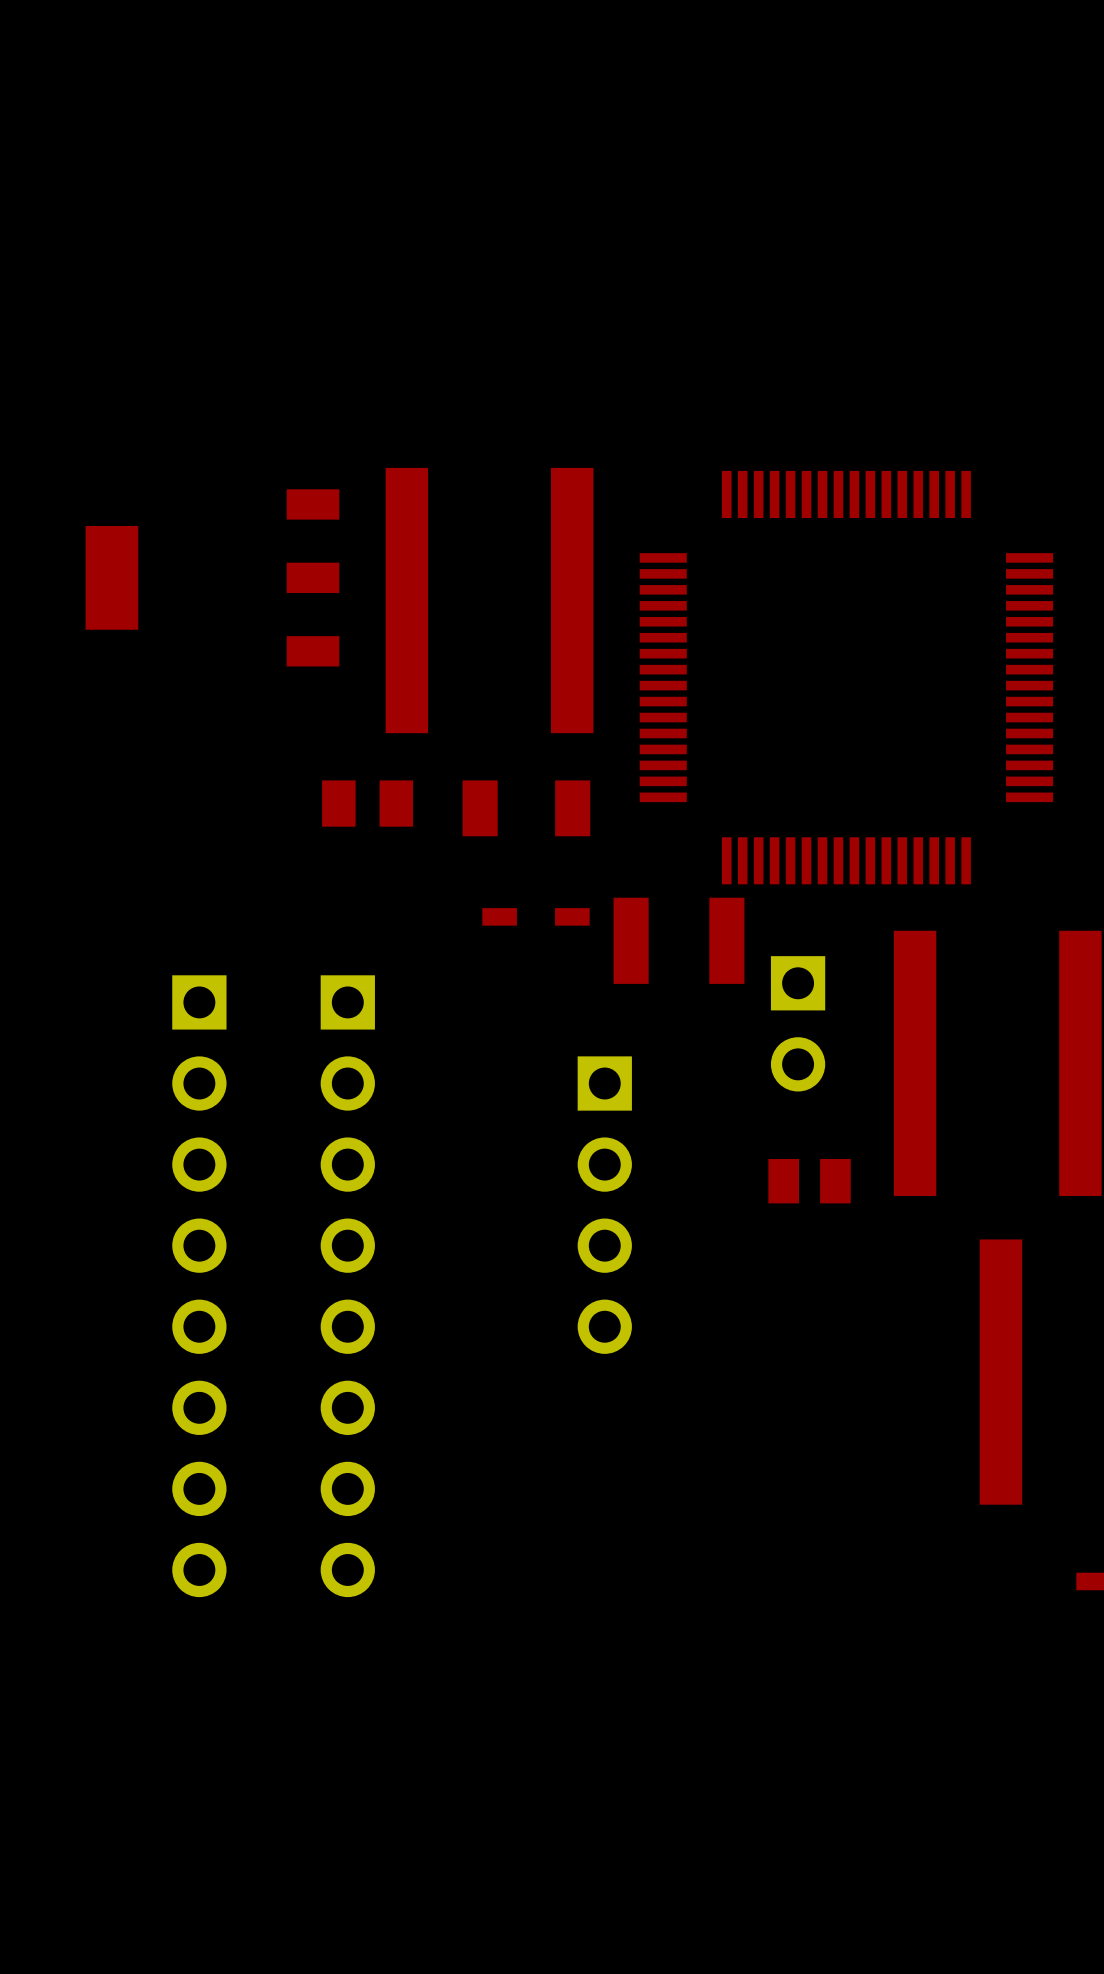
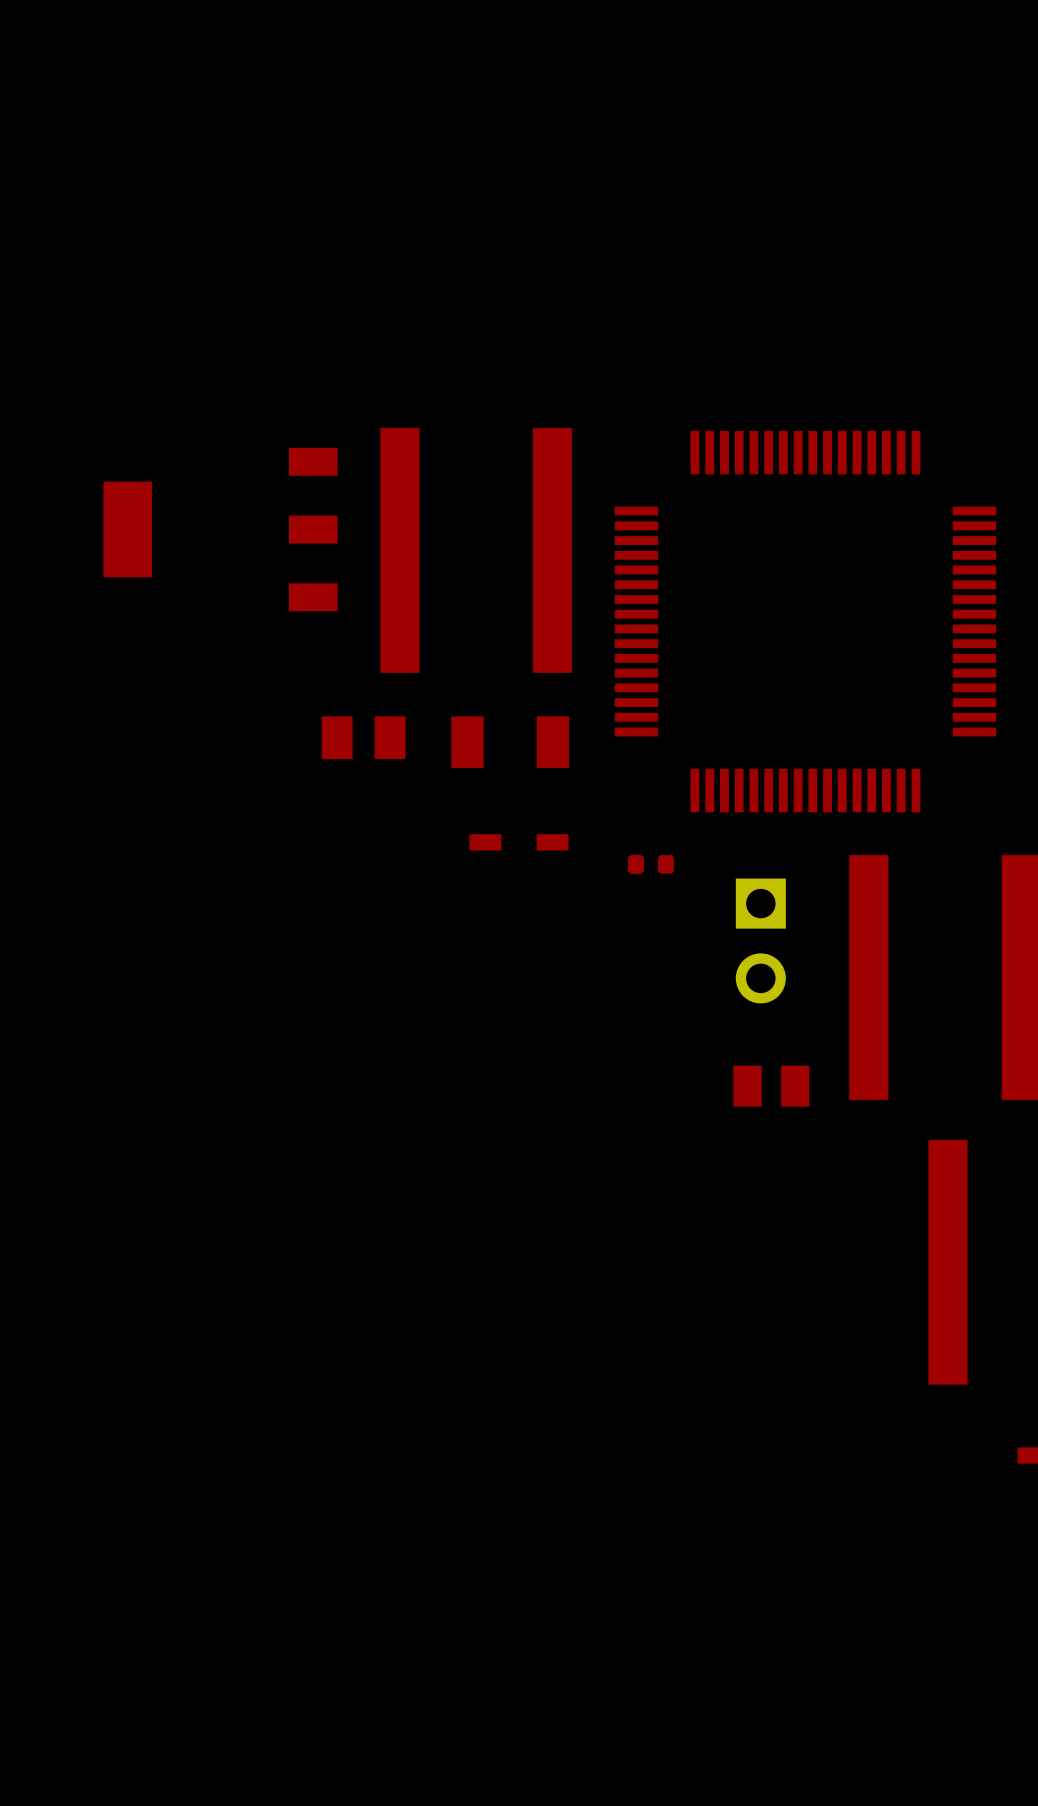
part footprint: [613, 897, 745, 984] -> [628, 854, 674, 874]
part: (604, 1205) -> none
part: (199, 1286) -> none
part: (347, 1286) -> none

